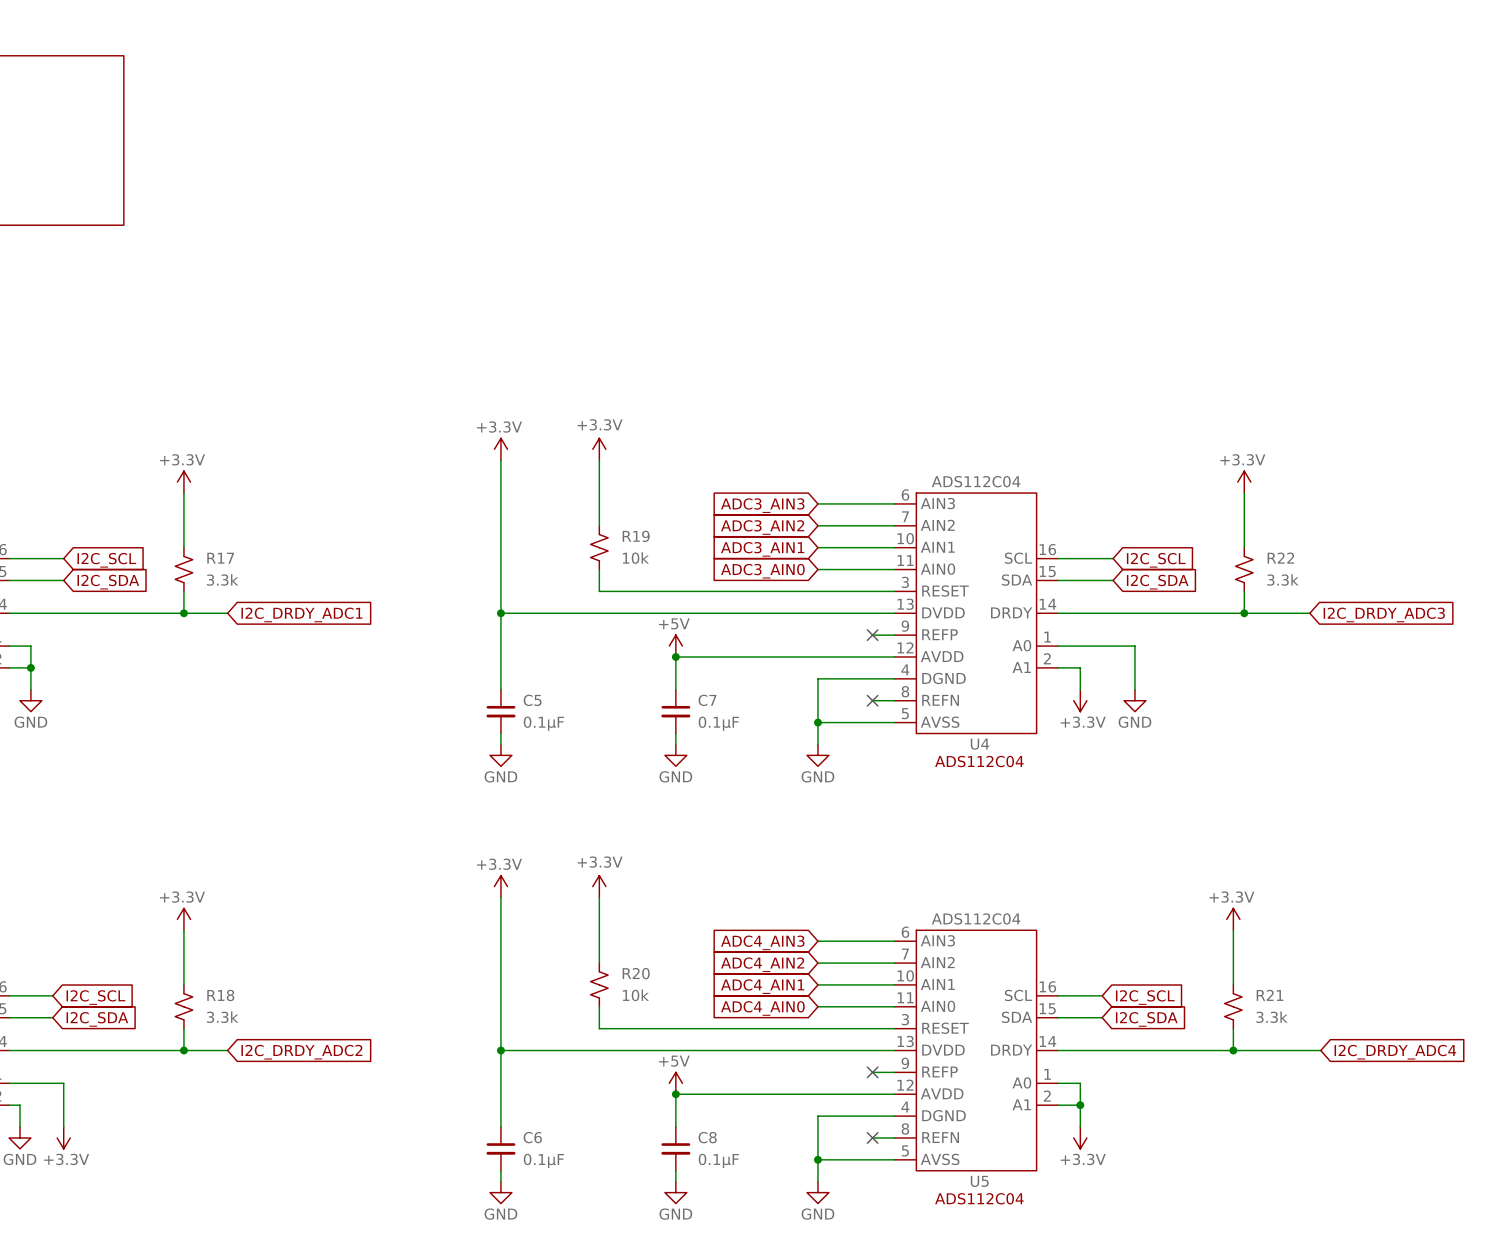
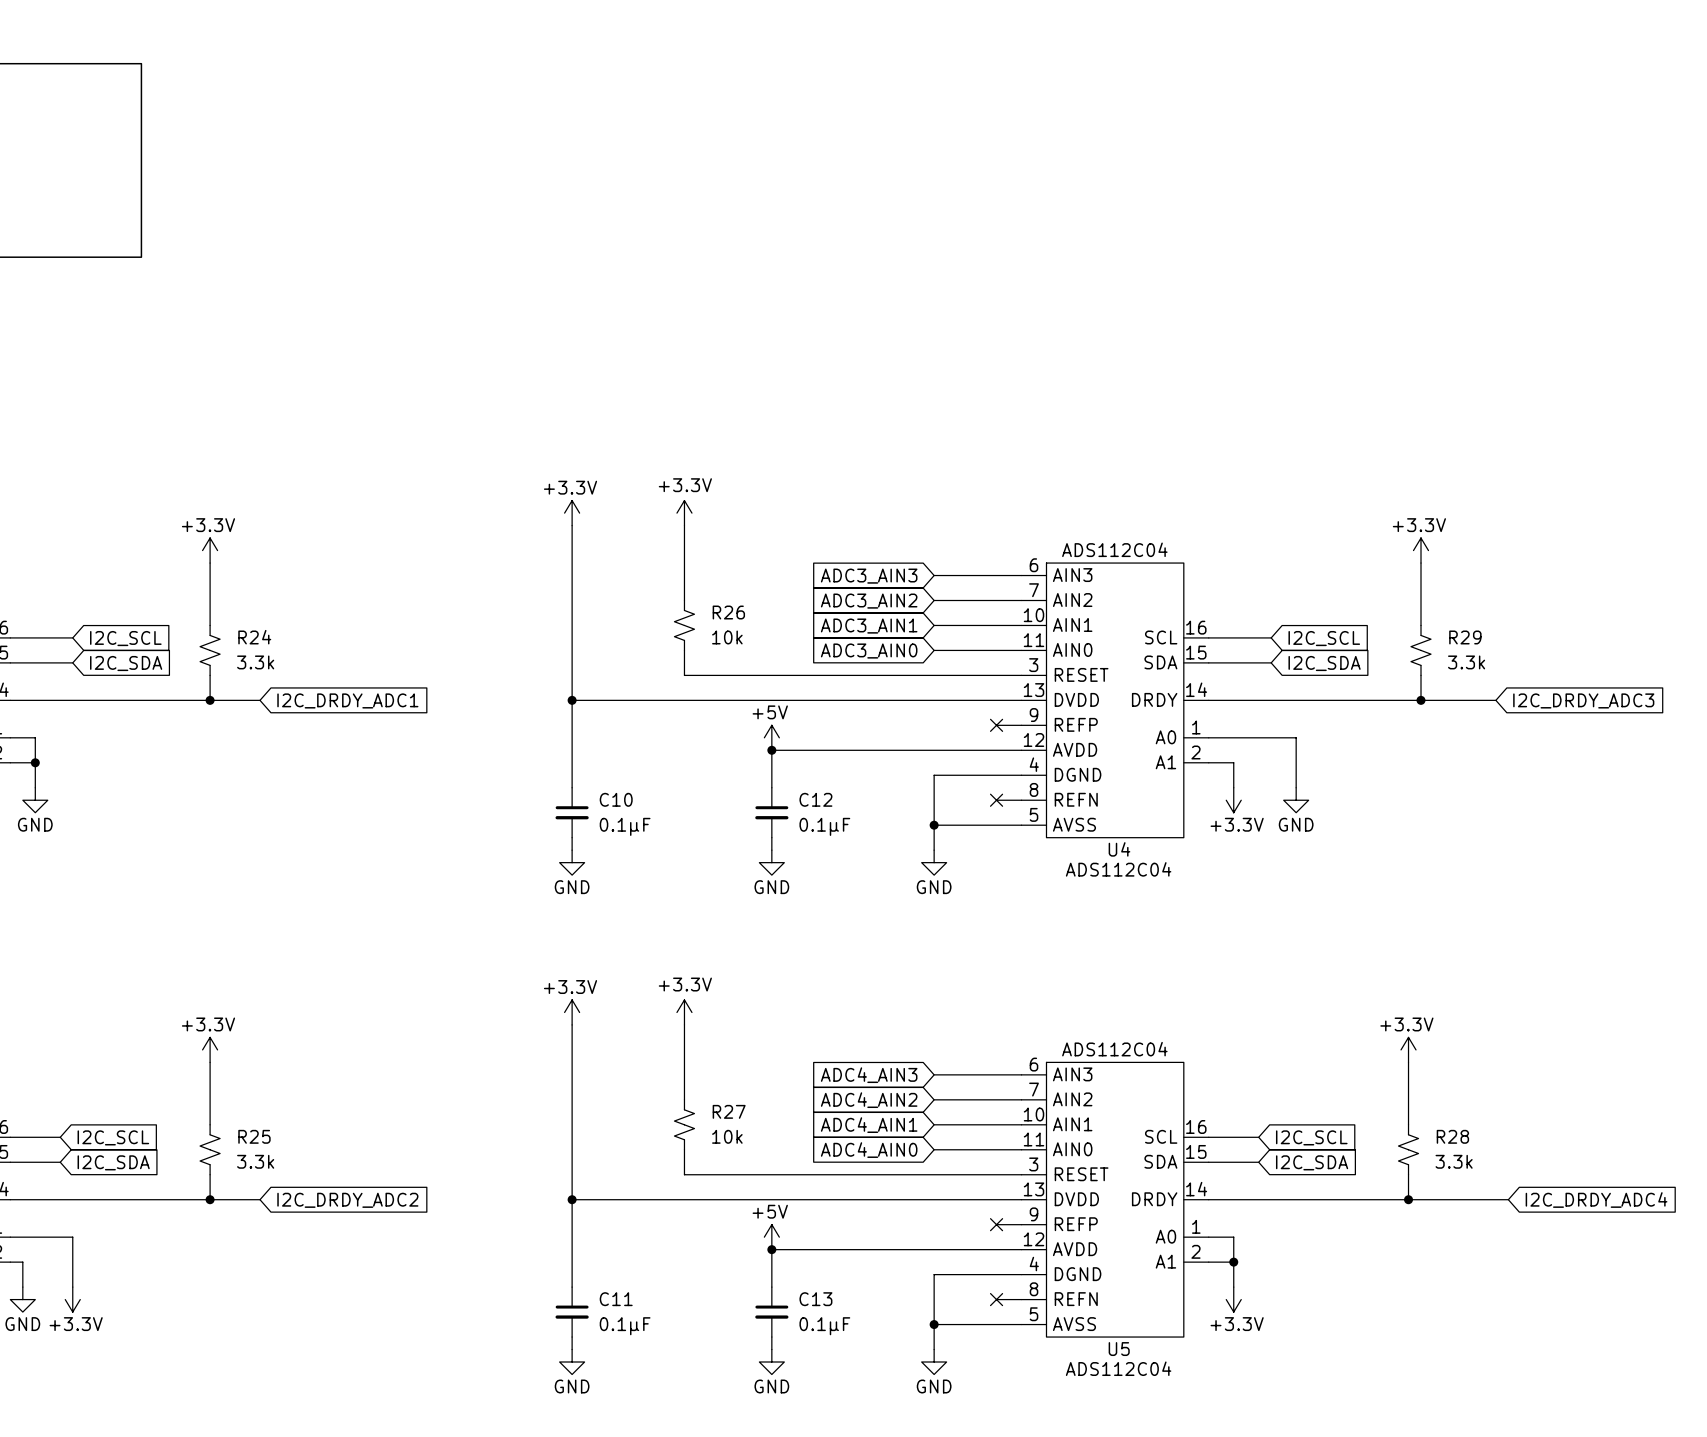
R19 name: R19 (636, 536) -> R26 (728, 612)
R17 name: R17 (220, 558) -> R24 (254, 637)
R22 name: R22 (1280, 558) -> R29 (1465, 637)
C5 name: C5 (532, 700) -> C10 (616, 799)
C7 name: C7 (707, 700) -> C12 (815, 799)
R20 name: R20 (636, 973) -> R27 (729, 1111)
R18 name: R18 (220, 995) -> R25 (254, 1136)
R21 name: R21 (1270, 995) -> R28 (1452, 1136)
C6 name: C6 (532, 1137) -> C11 (616, 1299)
C8 name: C8 (707, 1137) -> C13 (815, 1299)

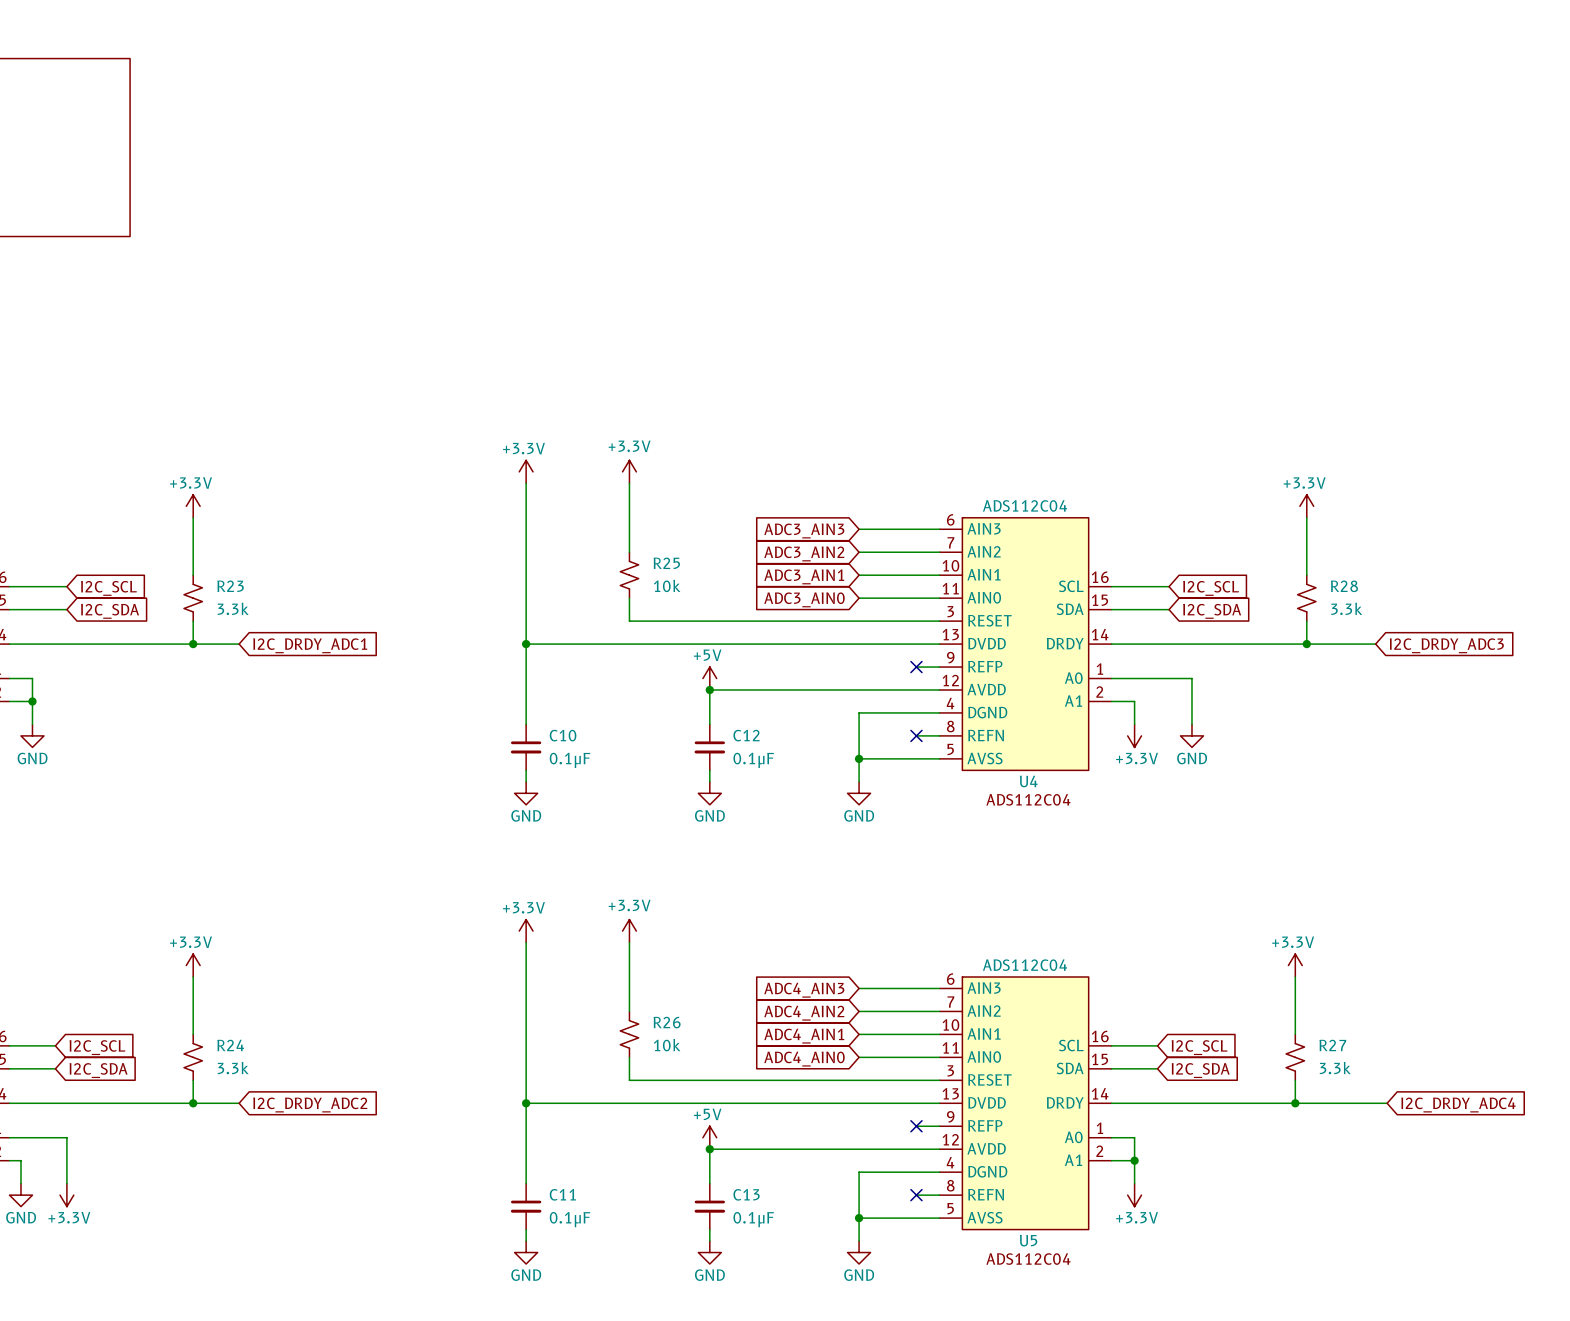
R26 name: R26 (728, 612) -> R25 (666, 563)
R24 name: R24 (254, 637) -> R23 (230, 586)
R29 name: R29 (1465, 637) -> R28 (1344, 586)
R27 name: R27 (729, 1111) -> R26 (667, 1022)
R25 name: R25 (254, 1136) -> R24 (230, 1045)
R28 name: R28 (1452, 1136) -> R27 (1332, 1045)

